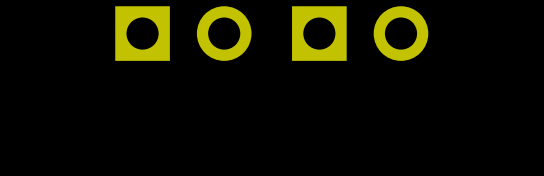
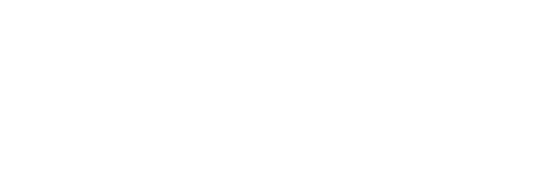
part: (183, 33) -> none
part: (360, 33) -> none

